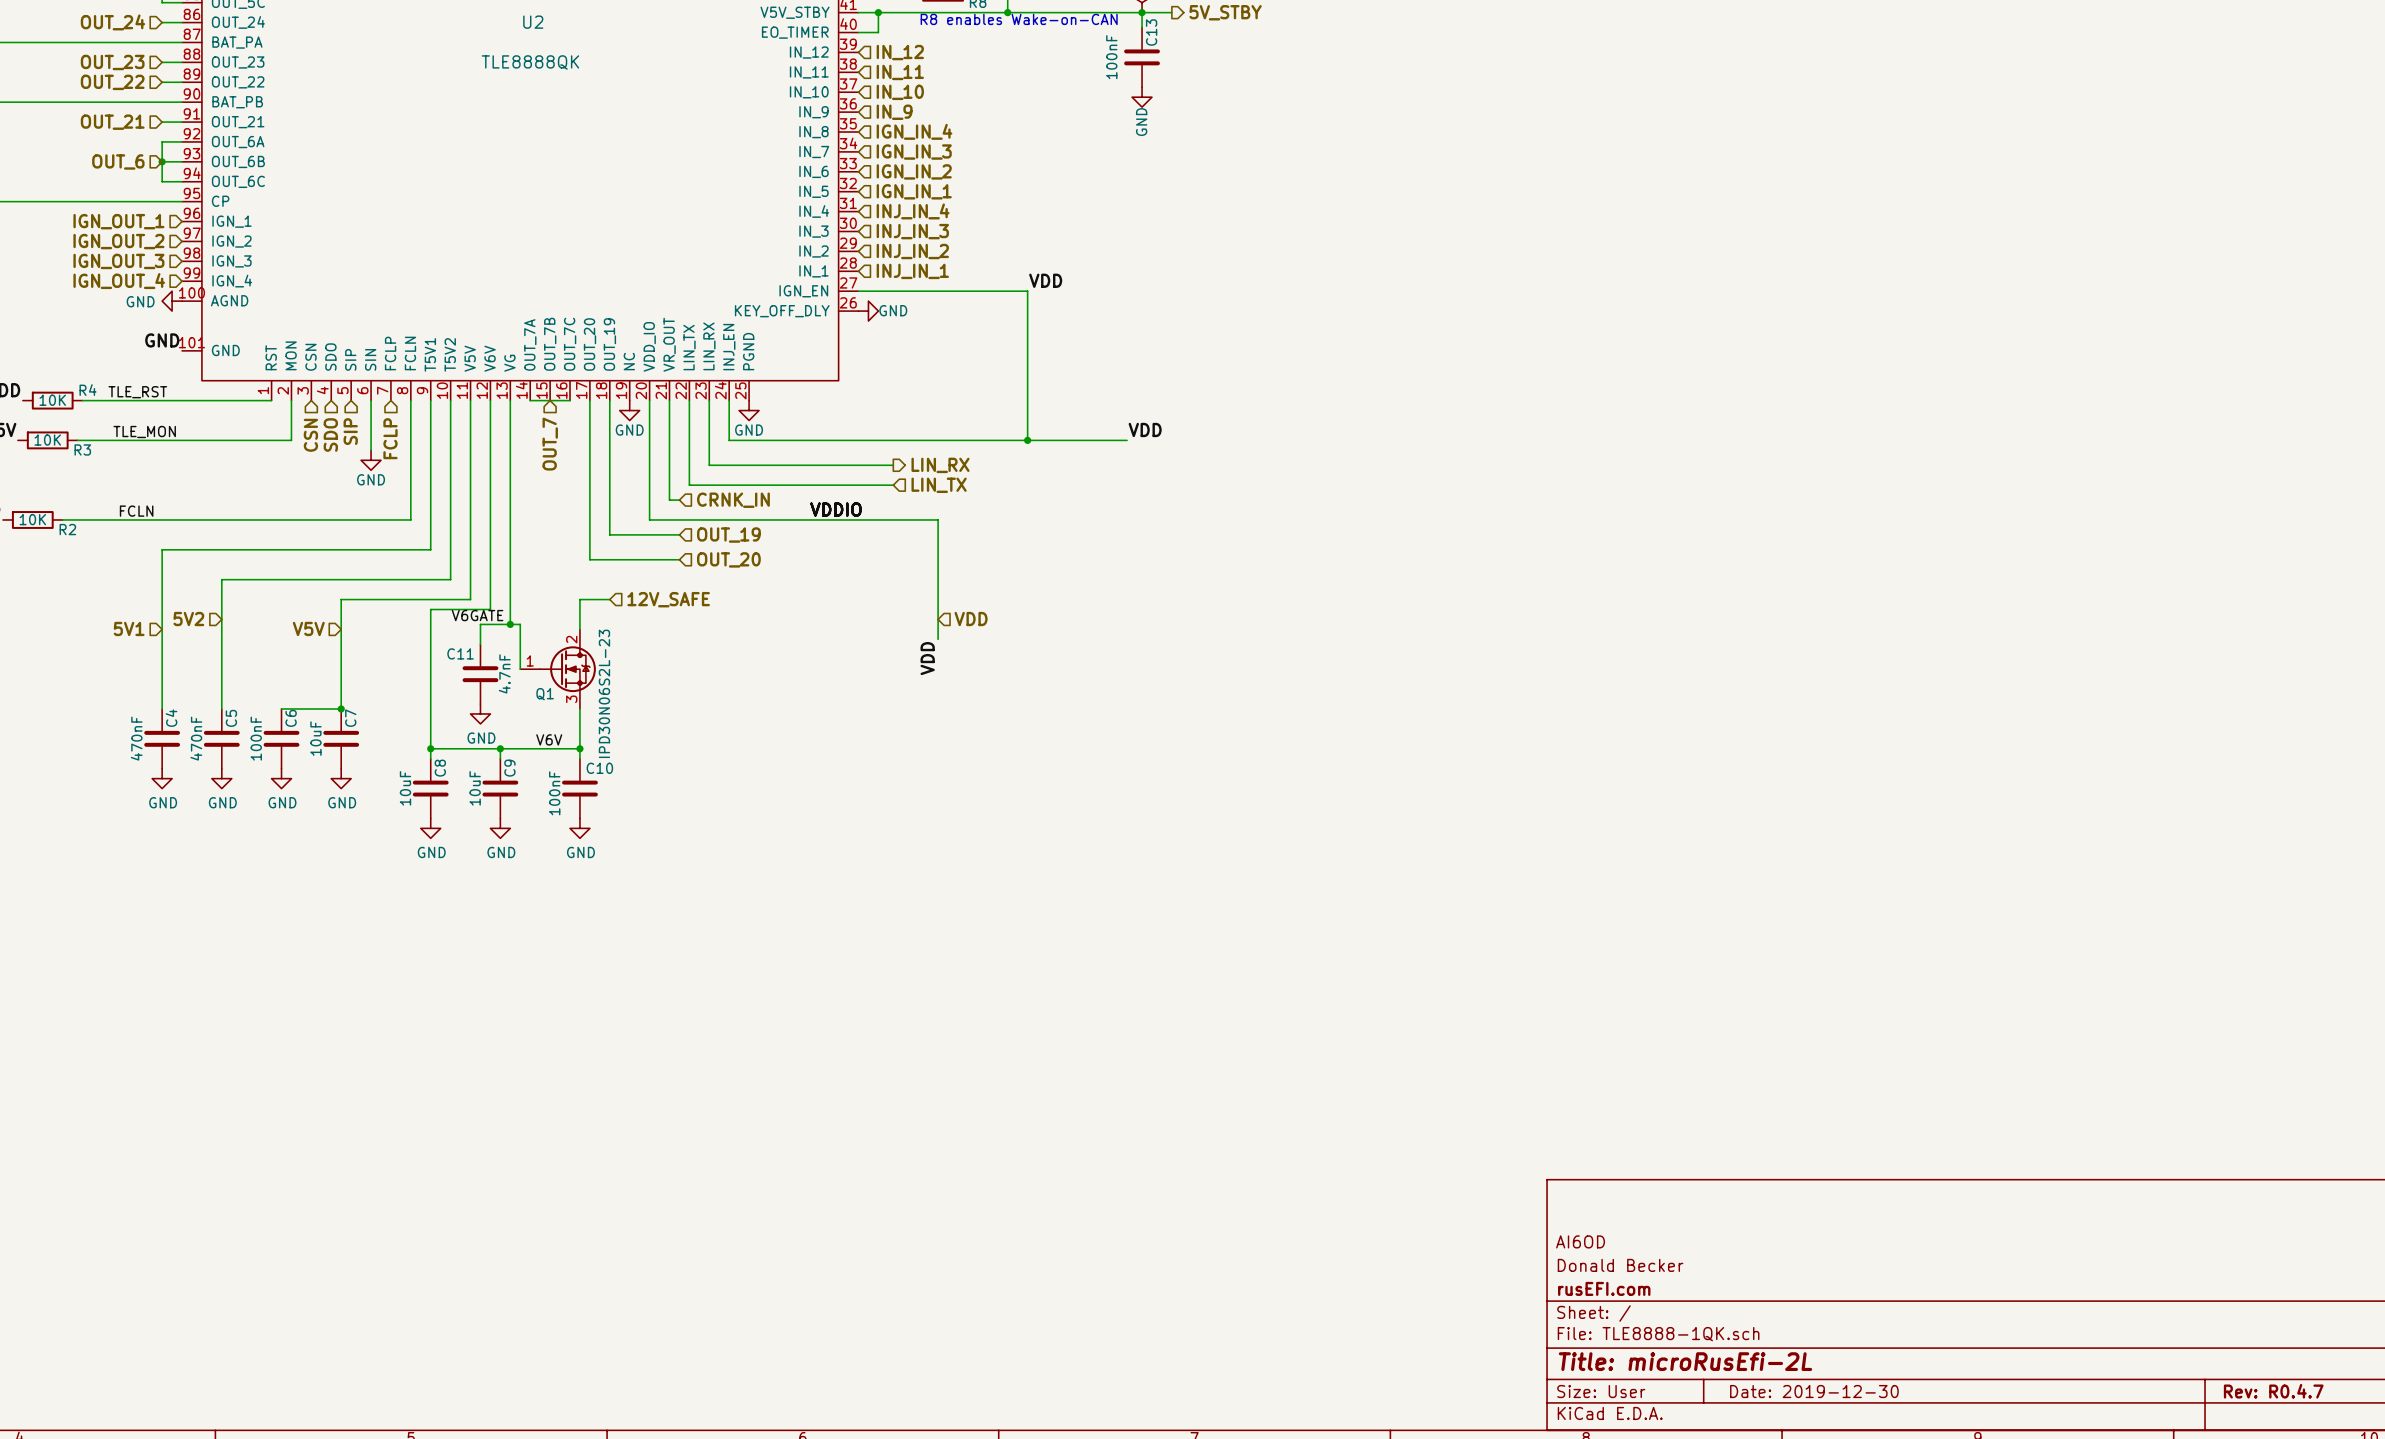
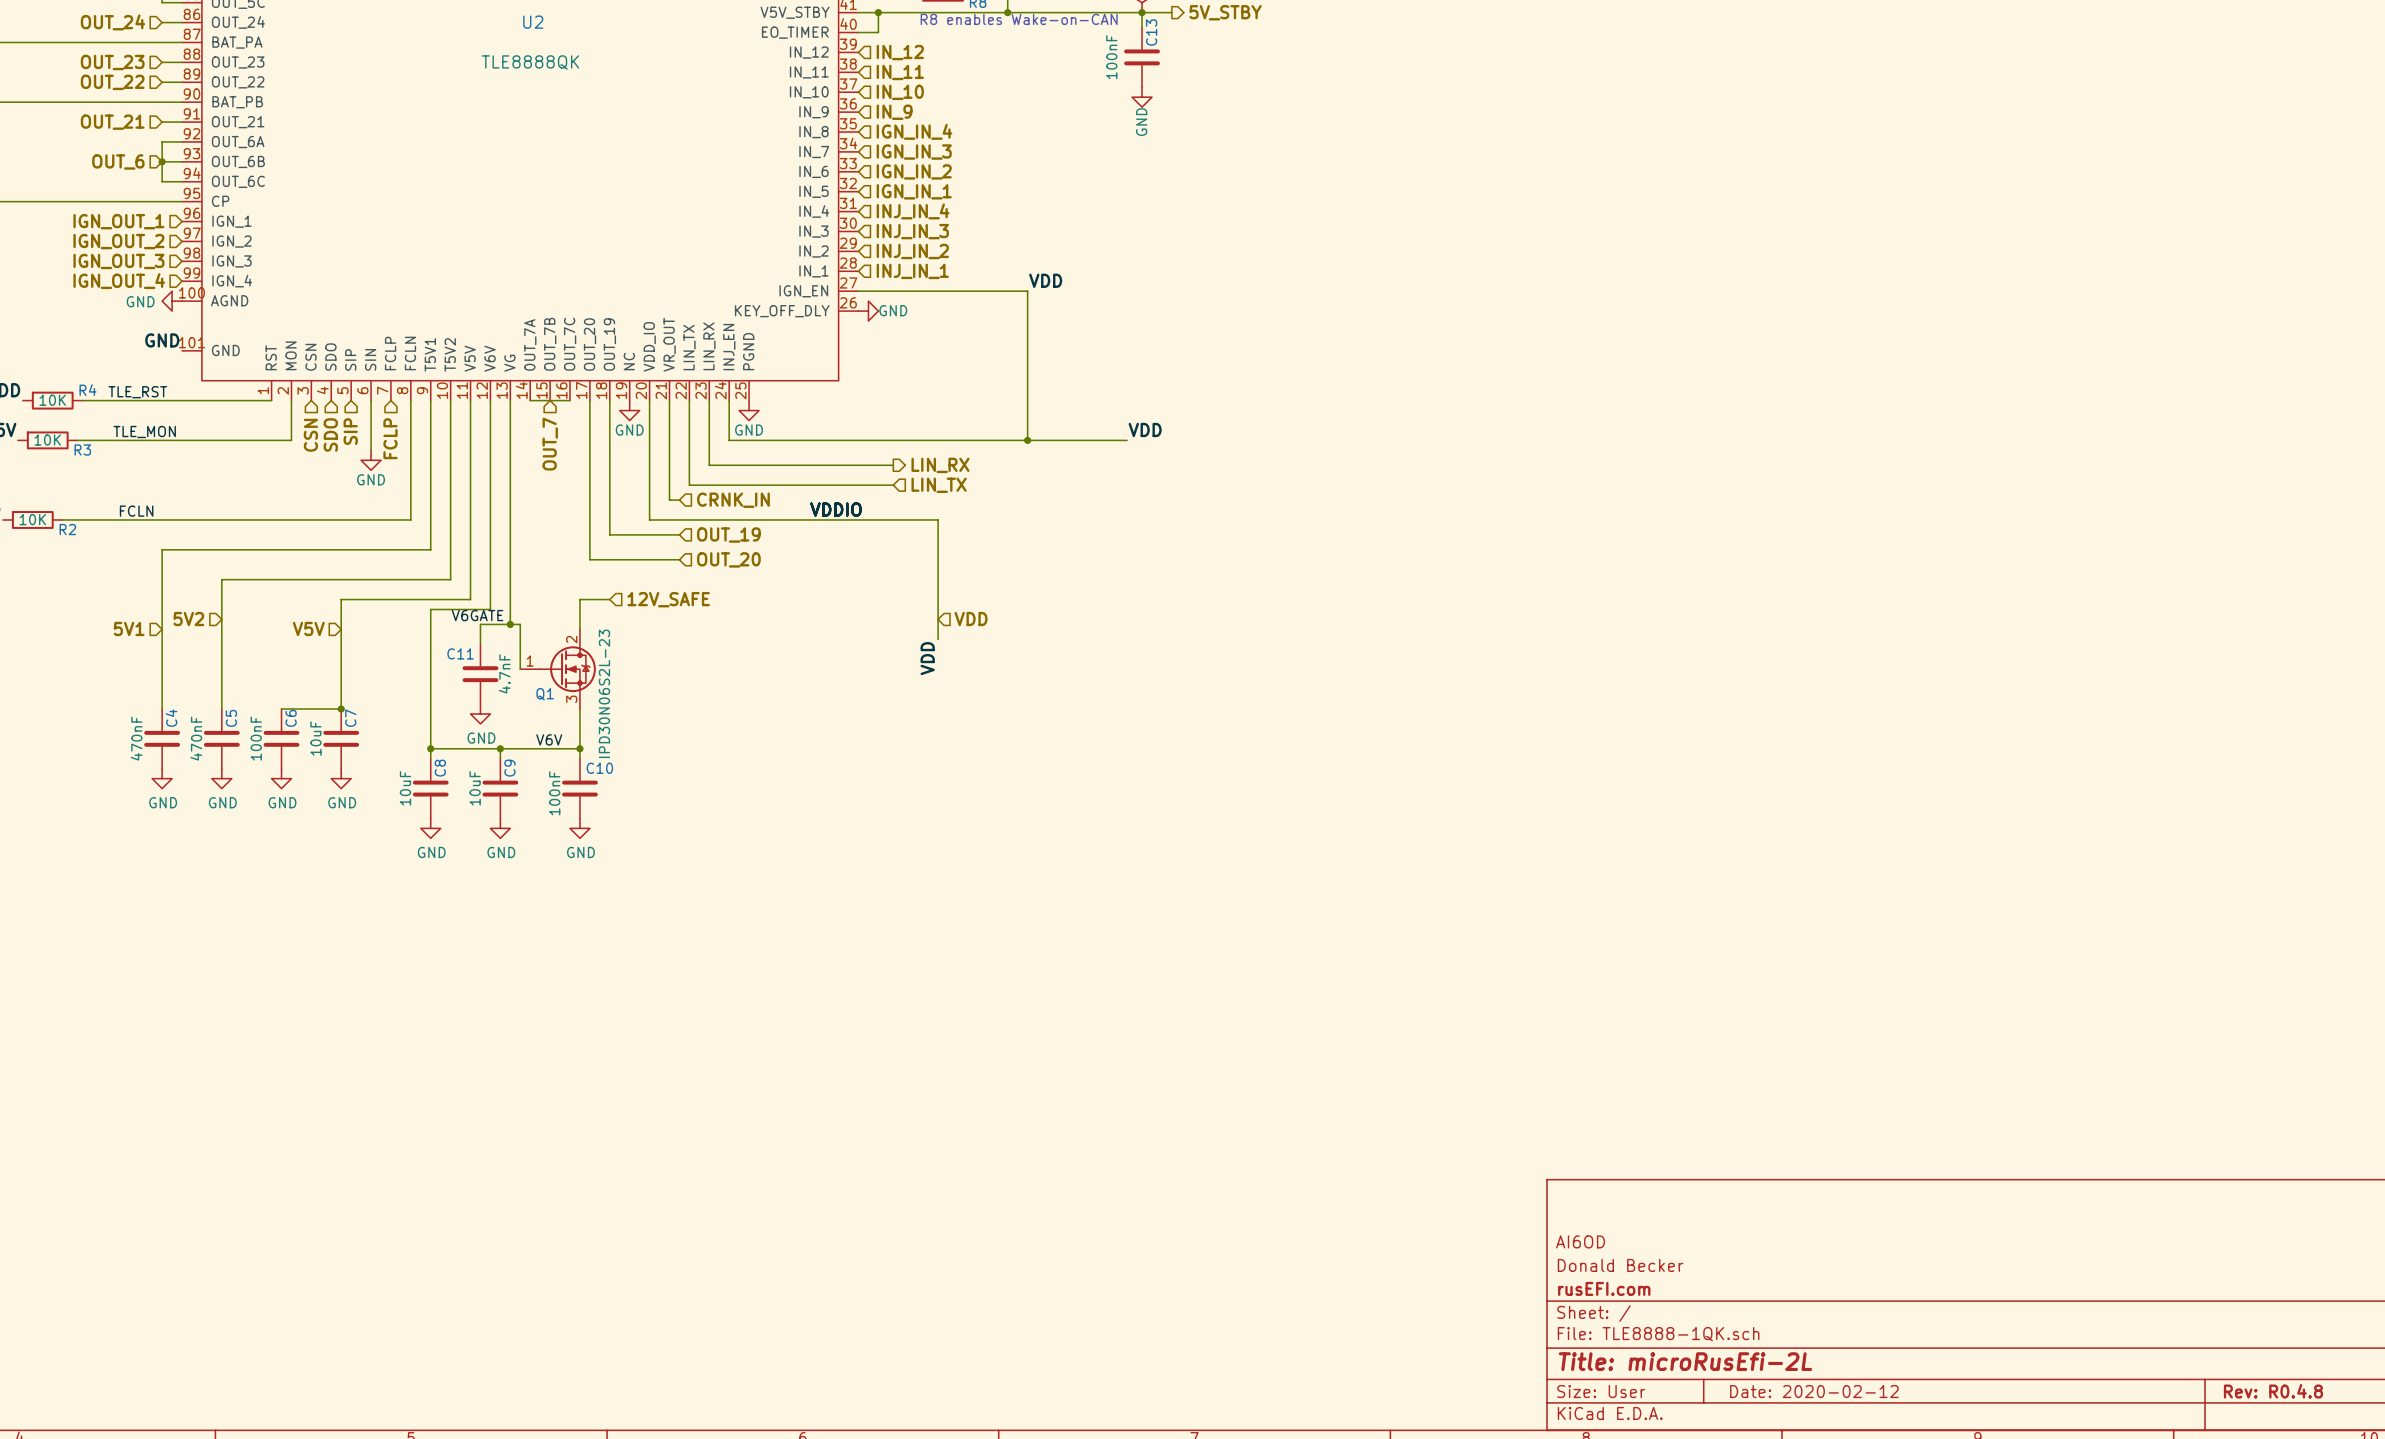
title block: Date: 2019-12-30 (1814, 1391) -> Date: 2020-02-12 (1814, 1391)
title block: Rev: R0.4.7 (2273, 1391) -> Rev: R0.4.8 (2273, 1391)

